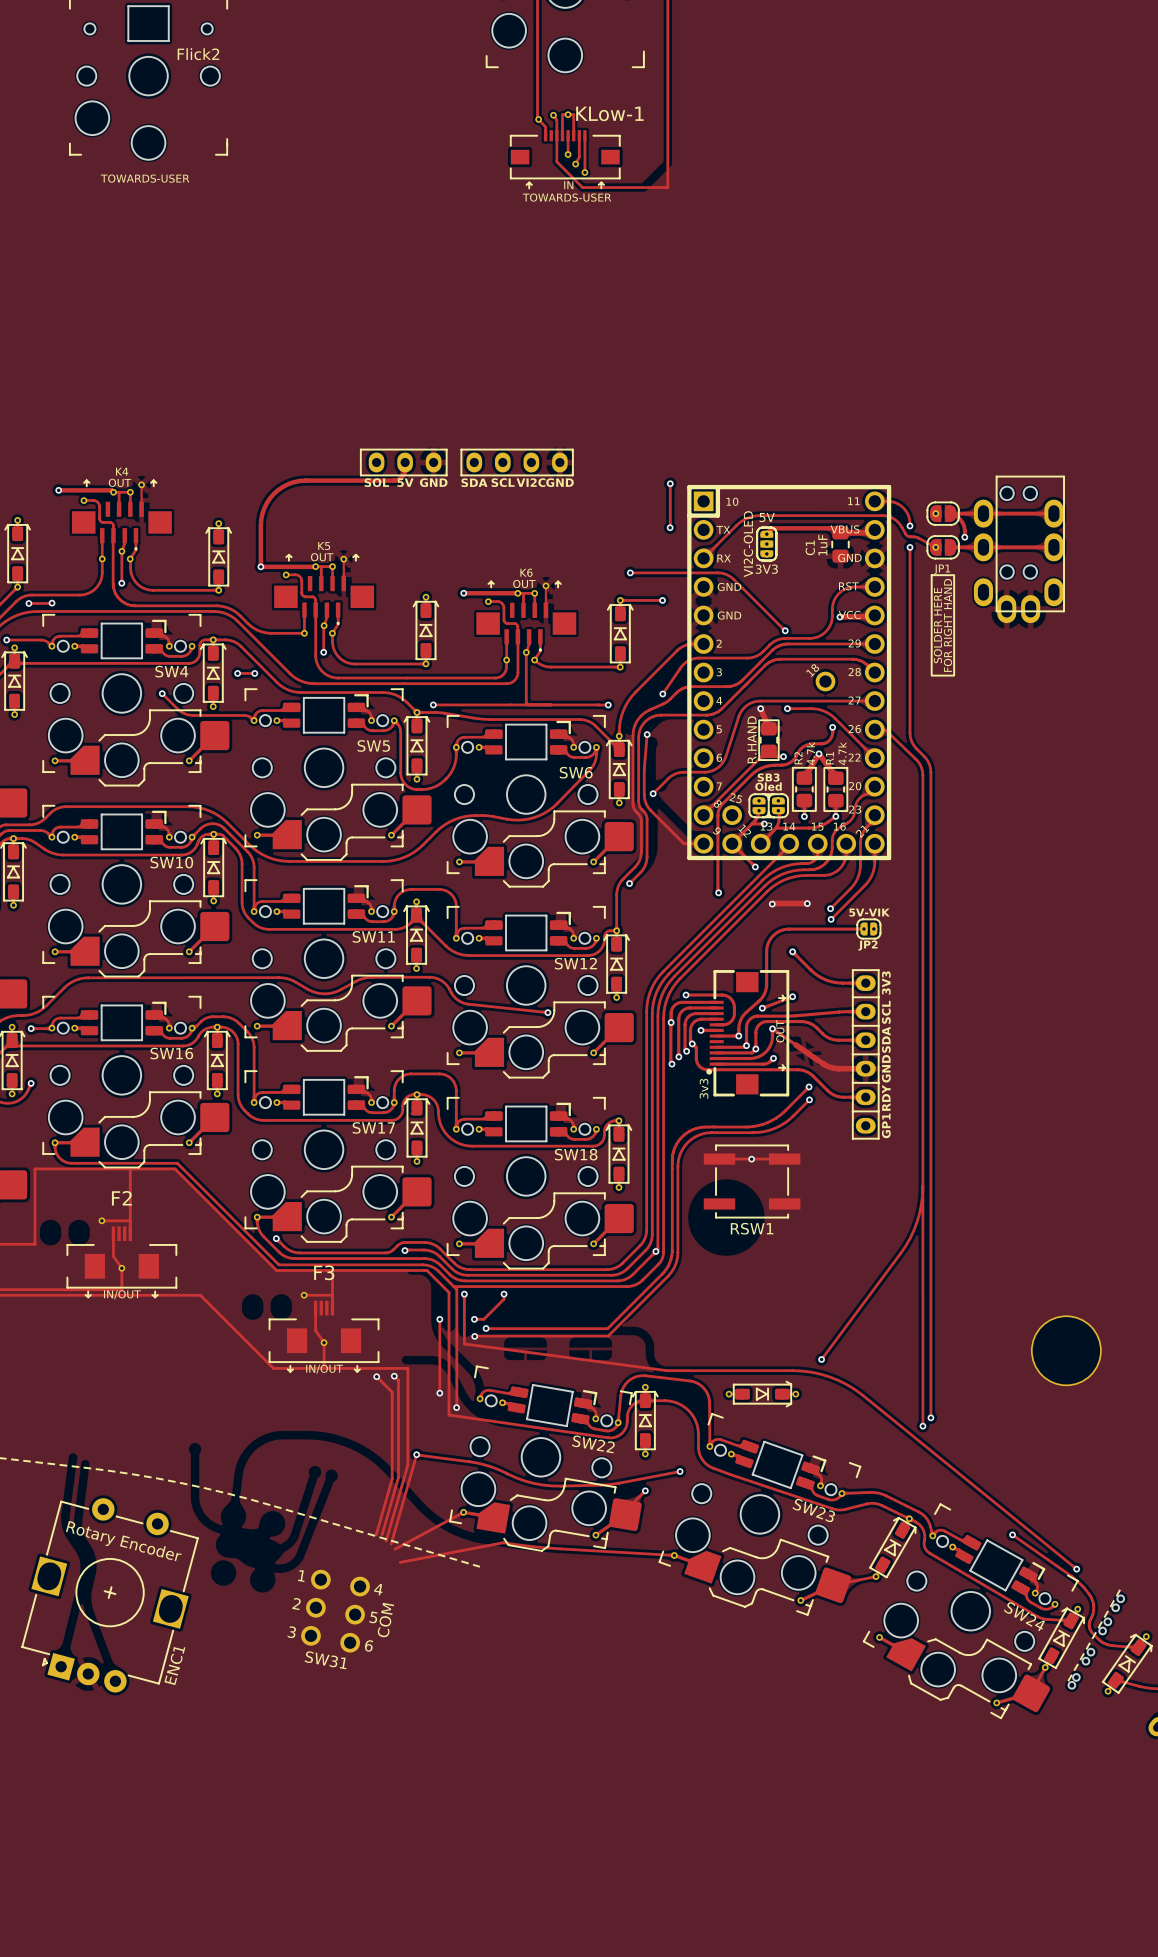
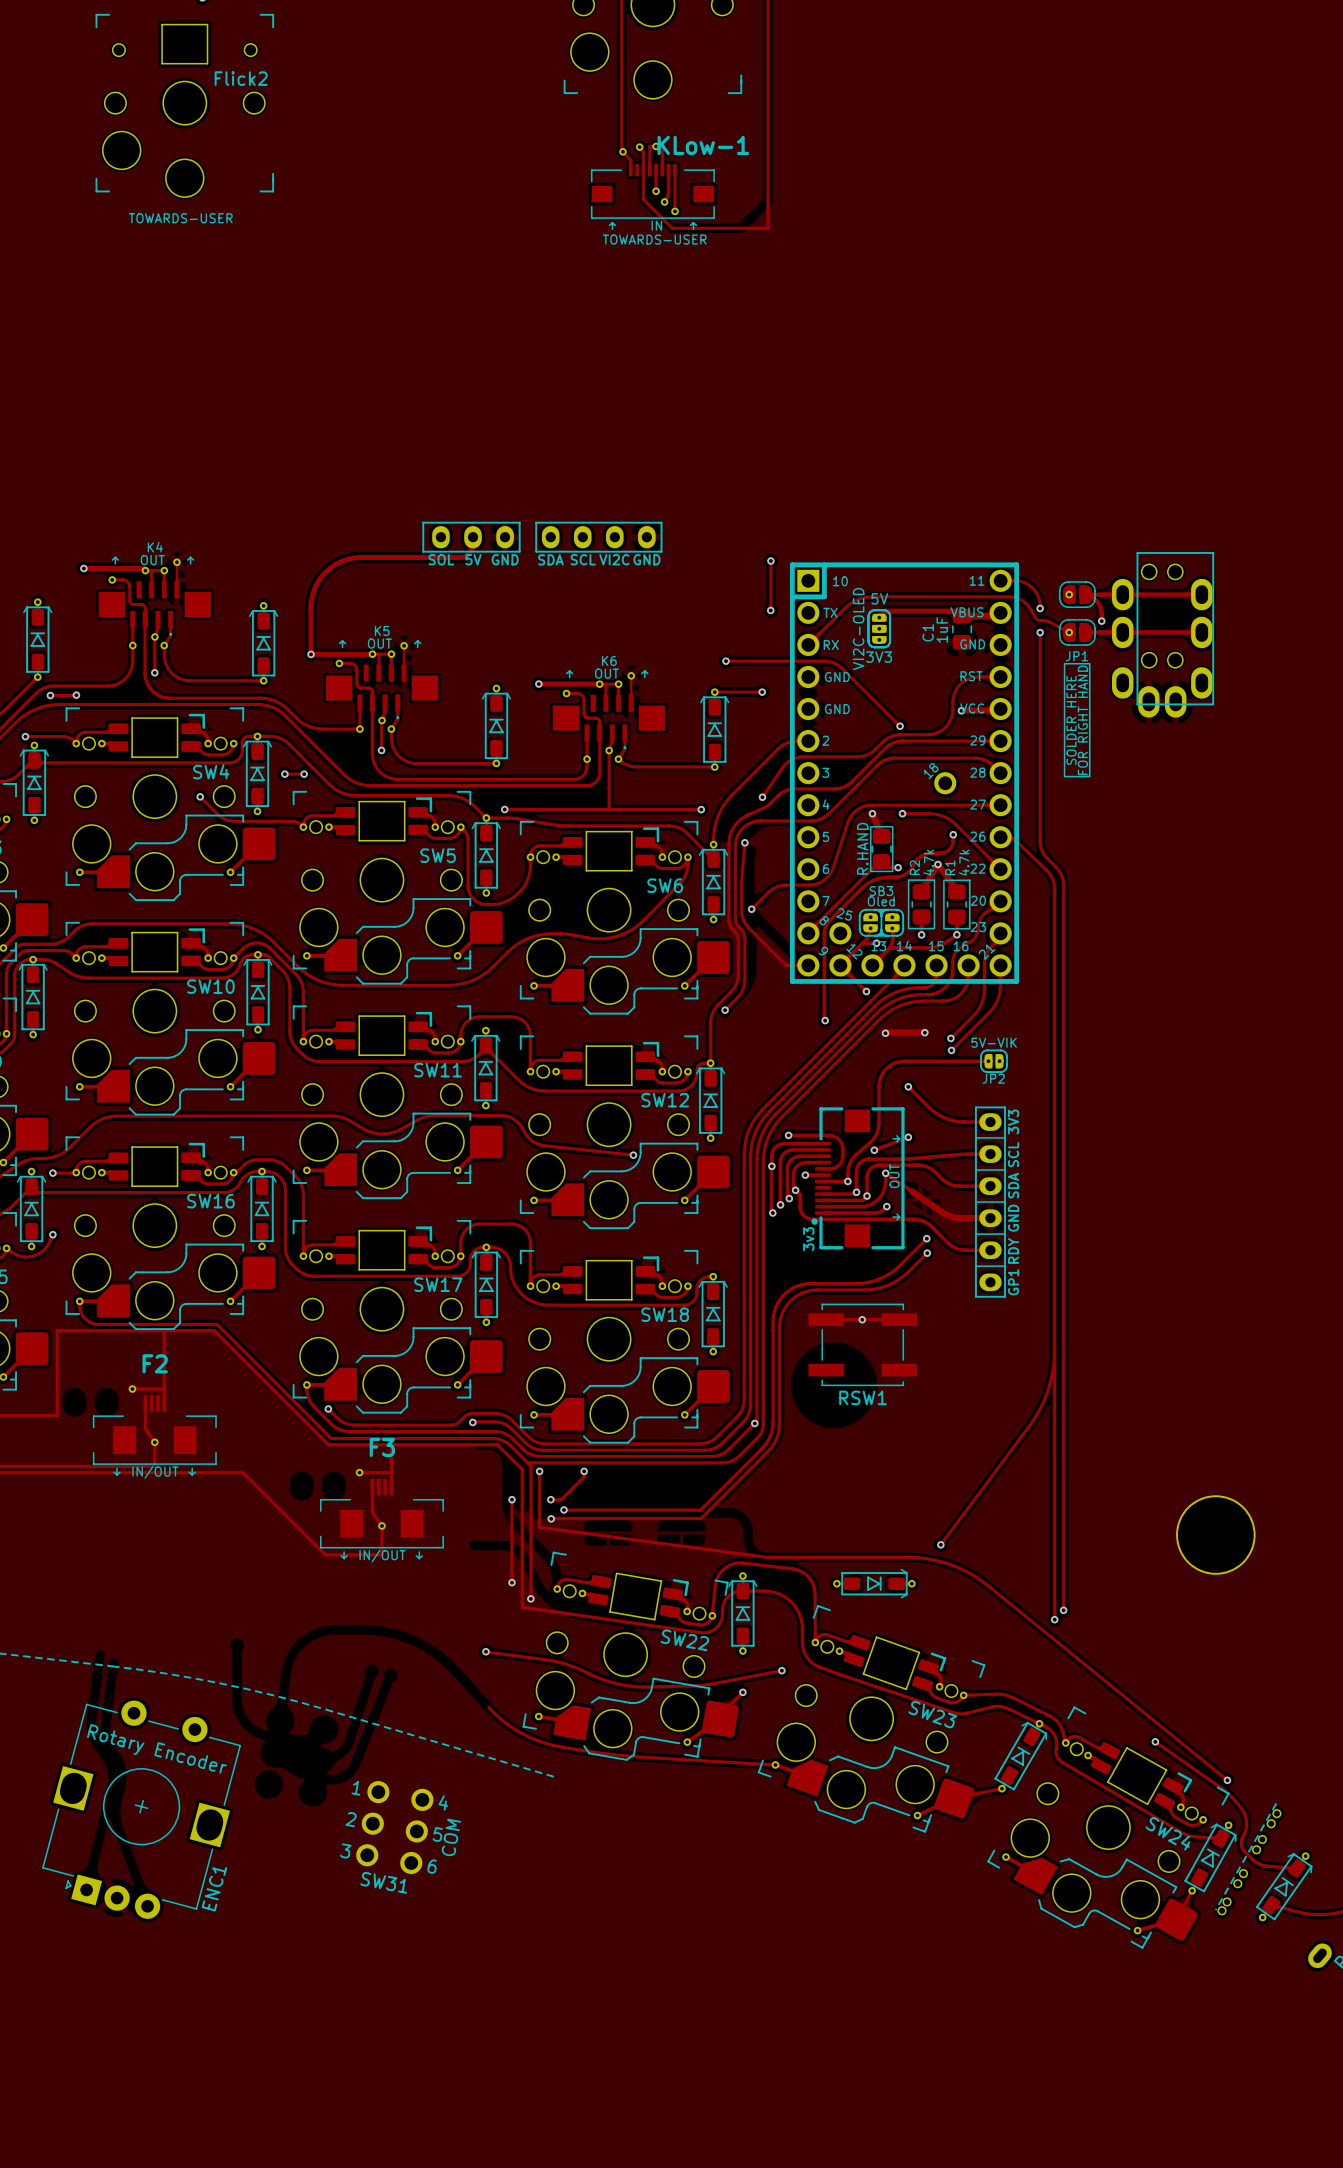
track: (324, 1368) (407, 1368) (407, 1464) (386, 1540) -> none
track: (376, 1376) (392, 1392) (392, 1478) (376, 1534) -> none
via: (376, 1376) -> none
track: (394, 1376) (398, 1380) (398, 1477) (382, 1534) -> none
via: (394, 1376) -> none
track: (416, 1454) (391, 1544) -> none
track: (463, 1512) (394, 1549) -> none
track: (503, 1542) (400, 1562) -> (583, 1750) (553, 1745) (529, 1737) (507, 1724) (488, 1707)

